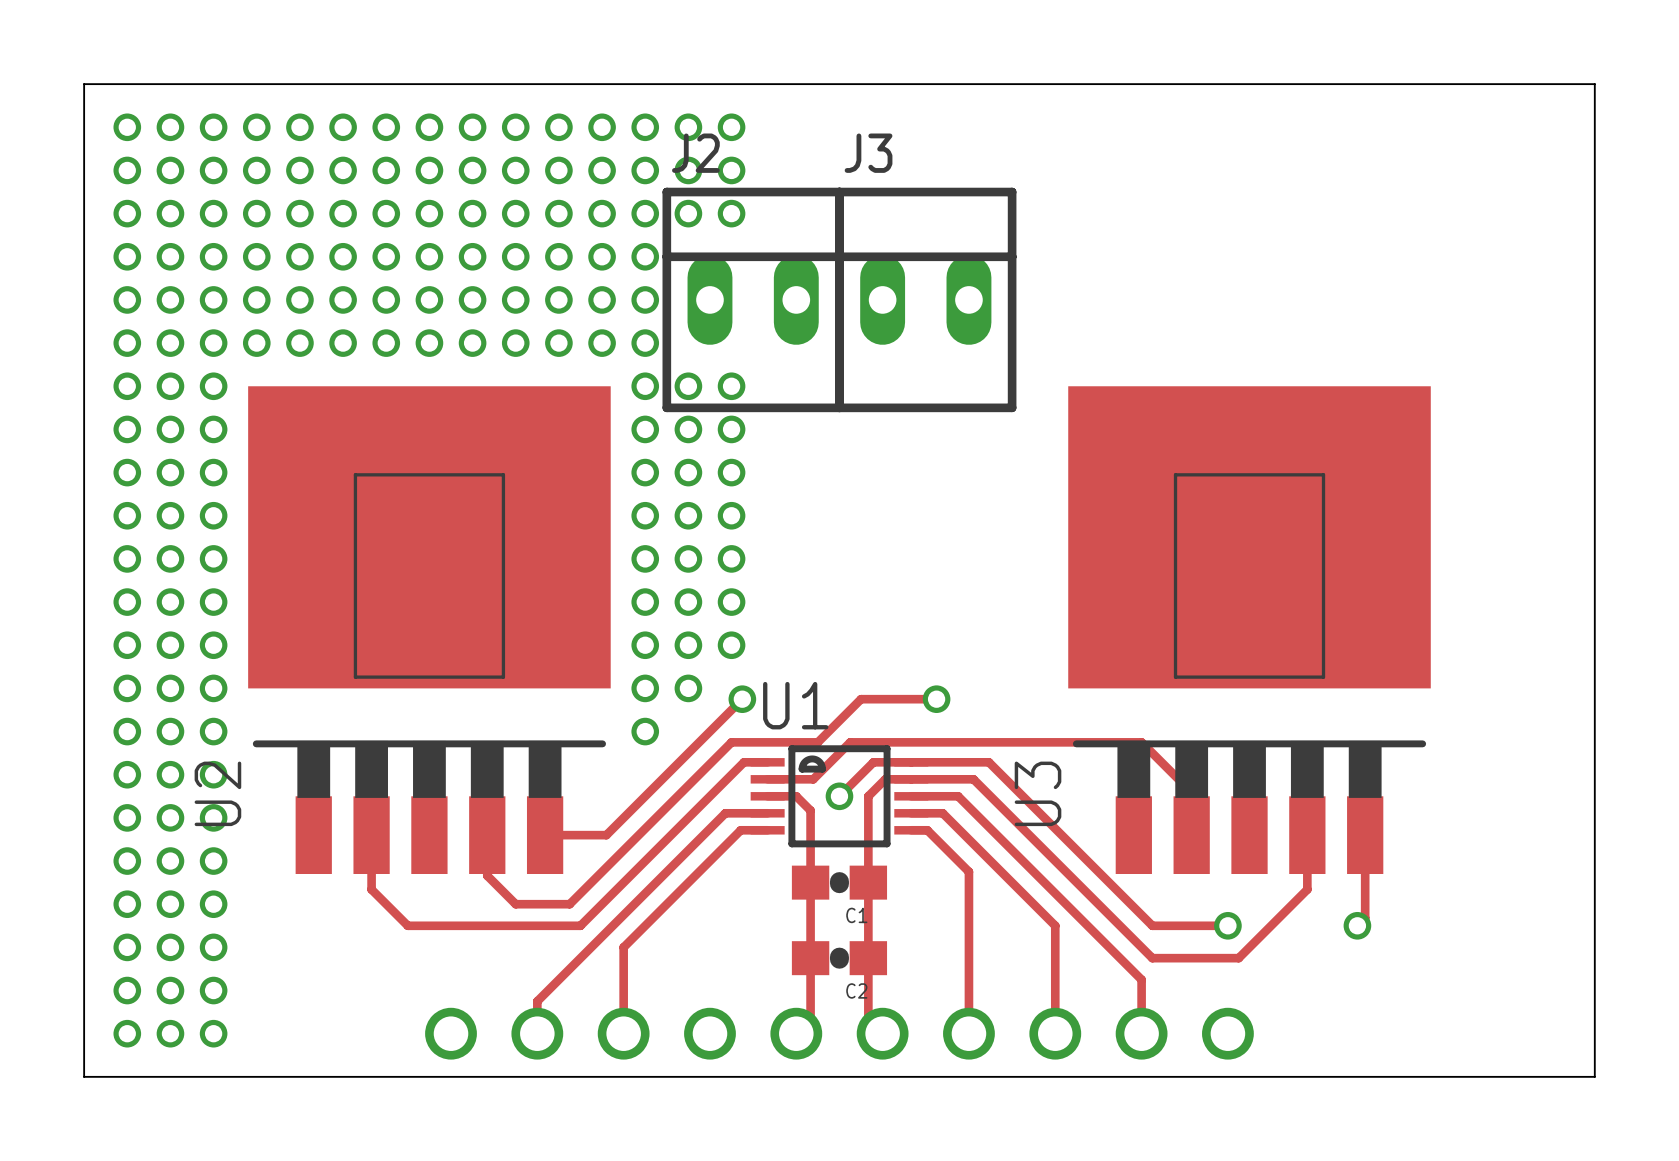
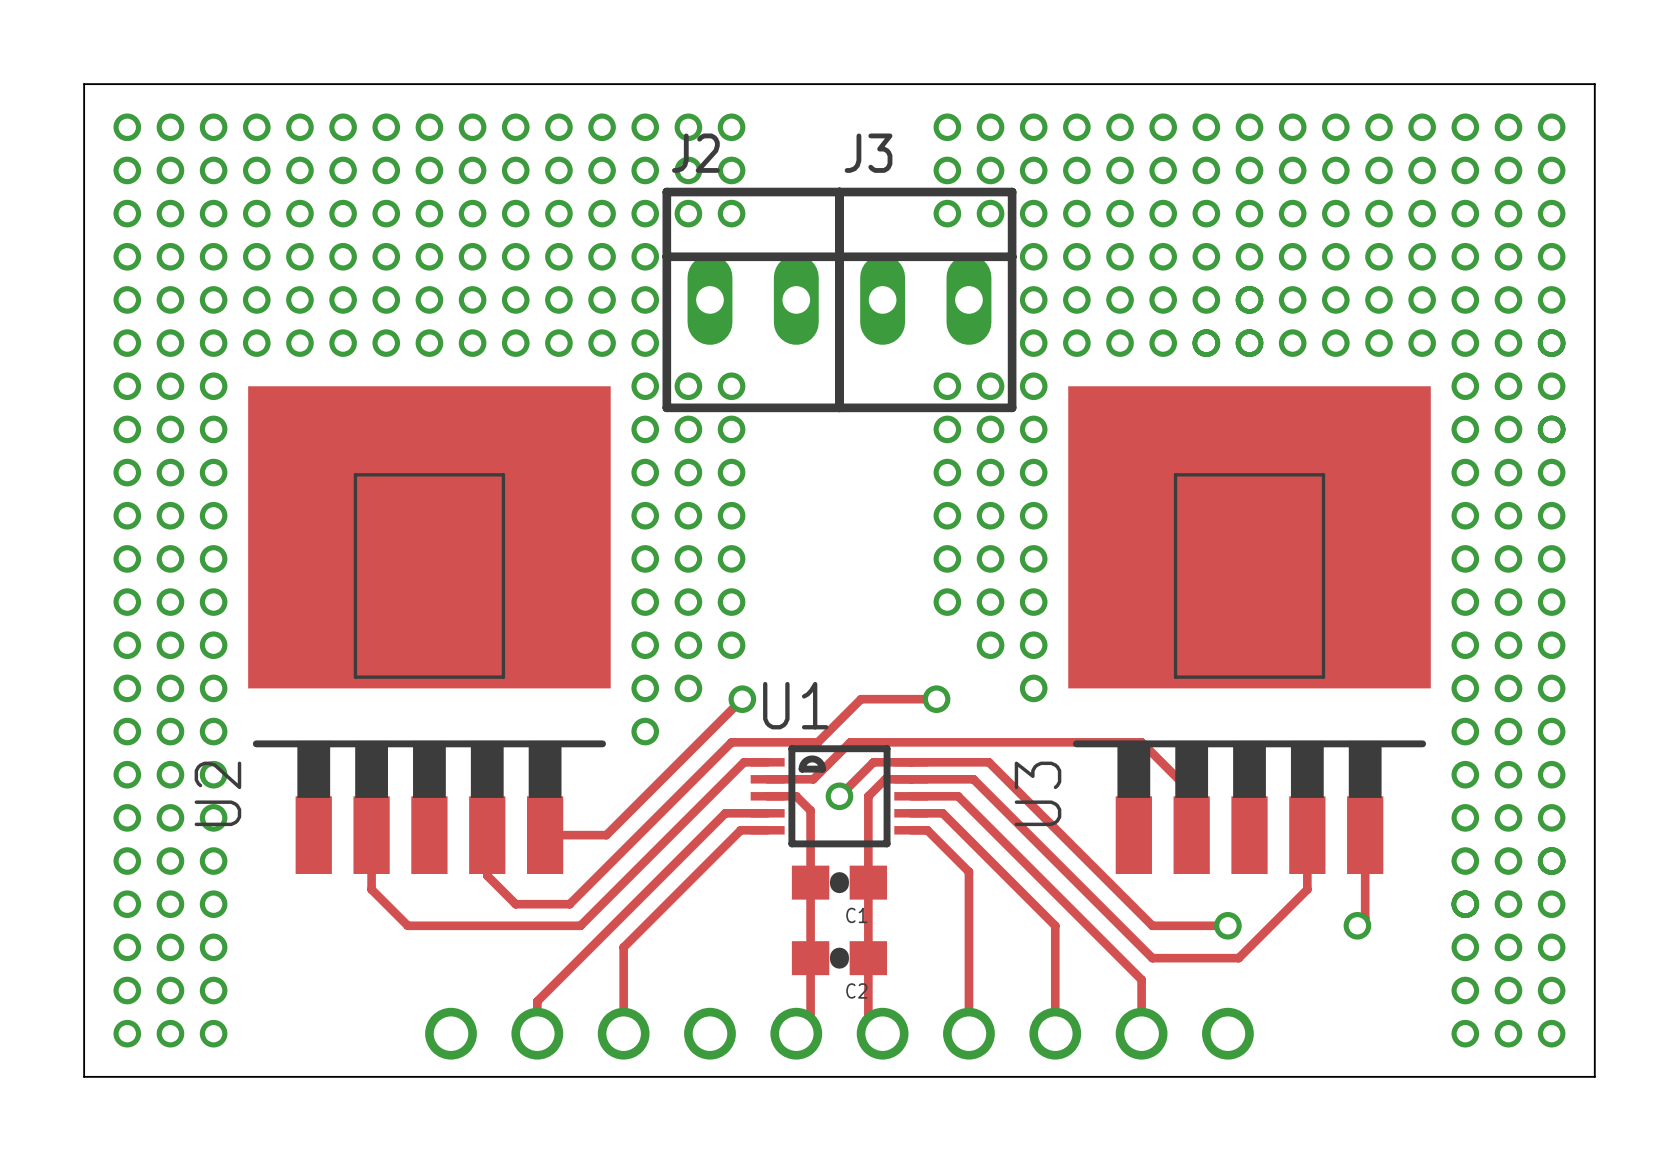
via: none -> (947, 127)
via: none -> (990, 127)
via: none -> (1033, 127)
via: none -> (1076, 127)
via: none -> (1120, 127)
via: none -> (1163, 127)
via: none -> (1206, 127)
via: none -> (1249, 127)
via: none -> (1292, 127)
via: none -> (1335, 127)
via: none -> (1378, 127)
via: none -> (1422, 127)
via: none -> (1465, 127)
via: none -> (1508, 127)
via: none -> (1551, 127)
via: none -> (947, 170)
via: none -> (990, 170)
via: none -> (1033, 170)
via: none -> (1076, 170)
via: none -> (1120, 170)
via: none -> (1163, 170)
via: none -> (1206, 170)
via: none -> (1249, 170)
via: none -> (1292, 170)
via: none -> (1335, 170)
via: none -> (1378, 170)
via: none -> (1422, 170)
via: none -> (1465, 170)
via: none -> (1508, 170)
via: none -> (1551, 170)
via: none -> (947, 213)
via: none -> (990, 213)
via: none -> (1033, 213)
via: none -> (1076, 213)
via: none -> (1120, 213)
via: none -> (1163, 213)
via: none -> (1206, 213)
via: none -> (1249, 213)
via: none -> (1292, 213)
via: none -> (1335, 213)
via: none -> (1378, 213)
via: none -> (1422, 213)
via: none -> (1465, 213)
via: none -> (1508, 213)
via: none -> (1551, 213)
via: none -> (1033, 256)
via: none -> (1076, 256)
via: none -> (1120, 256)
via: none -> (1163, 256)
via: none -> (1206, 256)
via: none -> (1249, 256)
via: none -> (1292, 256)
via: none -> (1335, 256)
via: none -> (1378, 256)
via: none -> (1422, 256)
via: none -> (1465, 256)
via: none -> (1508, 256)
via: none -> (1551, 256)
via: none -> (1033, 299)
via: none -> (1076, 299)
via: none -> (1120, 299)
via: none -> (1163, 299)
via: none -> (1206, 299)
via: none -> (1249, 299)
via: none -> (1292, 299)
via: none -> (1335, 299)
via: none -> (1378, 299)
via: none -> (1422, 299)
via: none -> (1465, 299)
via: none -> (1508, 299)
via: none -> (1551, 299)
via: none -> (1033, 343)
via: none -> (1076, 343)
via: none -> (1120, 343)
via: none -> (1163, 343)
via: none -> (1206, 343)
via: none -> (1249, 343)
via: none -> (1292, 343)
via: none -> (1335, 343)
via: none -> (1378, 343)
via: none -> (1422, 343)
via: none -> (1465, 343)
via: none -> (1508, 343)
via: none -> (1551, 343)
via: none -> (947, 386)
via: none -> (990, 386)
via: none -> (1033, 386)
via: none -> (1465, 386)
via: none -> (1508, 386)
via: none -> (1551, 386)
via: none -> (947, 429)
via: none -> (990, 429)
via: none -> (1033, 429)
via: none -> (1465, 429)
via: none -> (1508, 429)
via: none -> (1551, 429)
via: none -> (947, 472)
via: none -> (990, 472)
via: none -> (1033, 472)
via: none -> (1465, 472)
via: none -> (1508, 472)
via: none -> (1551, 472)
via: none -> (947, 515)
via: none -> (990, 515)
via: none -> (1033, 515)
via: none -> (1465, 515)
via: none -> (1508, 515)
via: none -> (1551, 515)
via: none -> (947, 558)
via: none -> (990, 558)
via: none -> (1033, 558)
via: none -> (1465, 558)
via: none -> (1508, 558)
via: none -> (1551, 558)
via: none -> (947, 602)
via: none -> (990, 602)
via: none -> (1033, 602)
via: none -> (1465, 602)
via: none -> (1508, 602)
via: none -> (1551, 602)
via: none -> (990, 645)
via: none -> (1033, 645)
via: none -> (1465, 645)
via: none -> (1508, 645)
via: none -> (1551, 645)
via: none -> (1033, 688)
via: none -> (1465, 688)
via: none -> (1508, 688)
via: none -> (1551, 688)
via: none -> (1465, 731)
via: none -> (1508, 731)
via: none -> (1551, 731)
via: none -> (1465, 774)
via: none -> (1508, 774)
via: none -> (1551, 774)
via: none -> (1465, 817)
via: none -> (1508, 817)
via: none -> (1551, 817)
via: none -> (1465, 861)
via: none -> (1508, 861)
via: none -> (1551, 861)
via: none -> (1465, 904)
via: none -> (1508, 904)
via: none -> (1551, 904)
via: none -> (1465, 947)
via: none -> (1508, 947)
via: none -> (1551, 947)
via: none -> (1465, 990)
via: none -> (1508, 990)
via: none -> (1551, 990)
via: none -> (1465, 1033)
via: none -> (1508, 1033)
via: none -> (1551, 1033)

